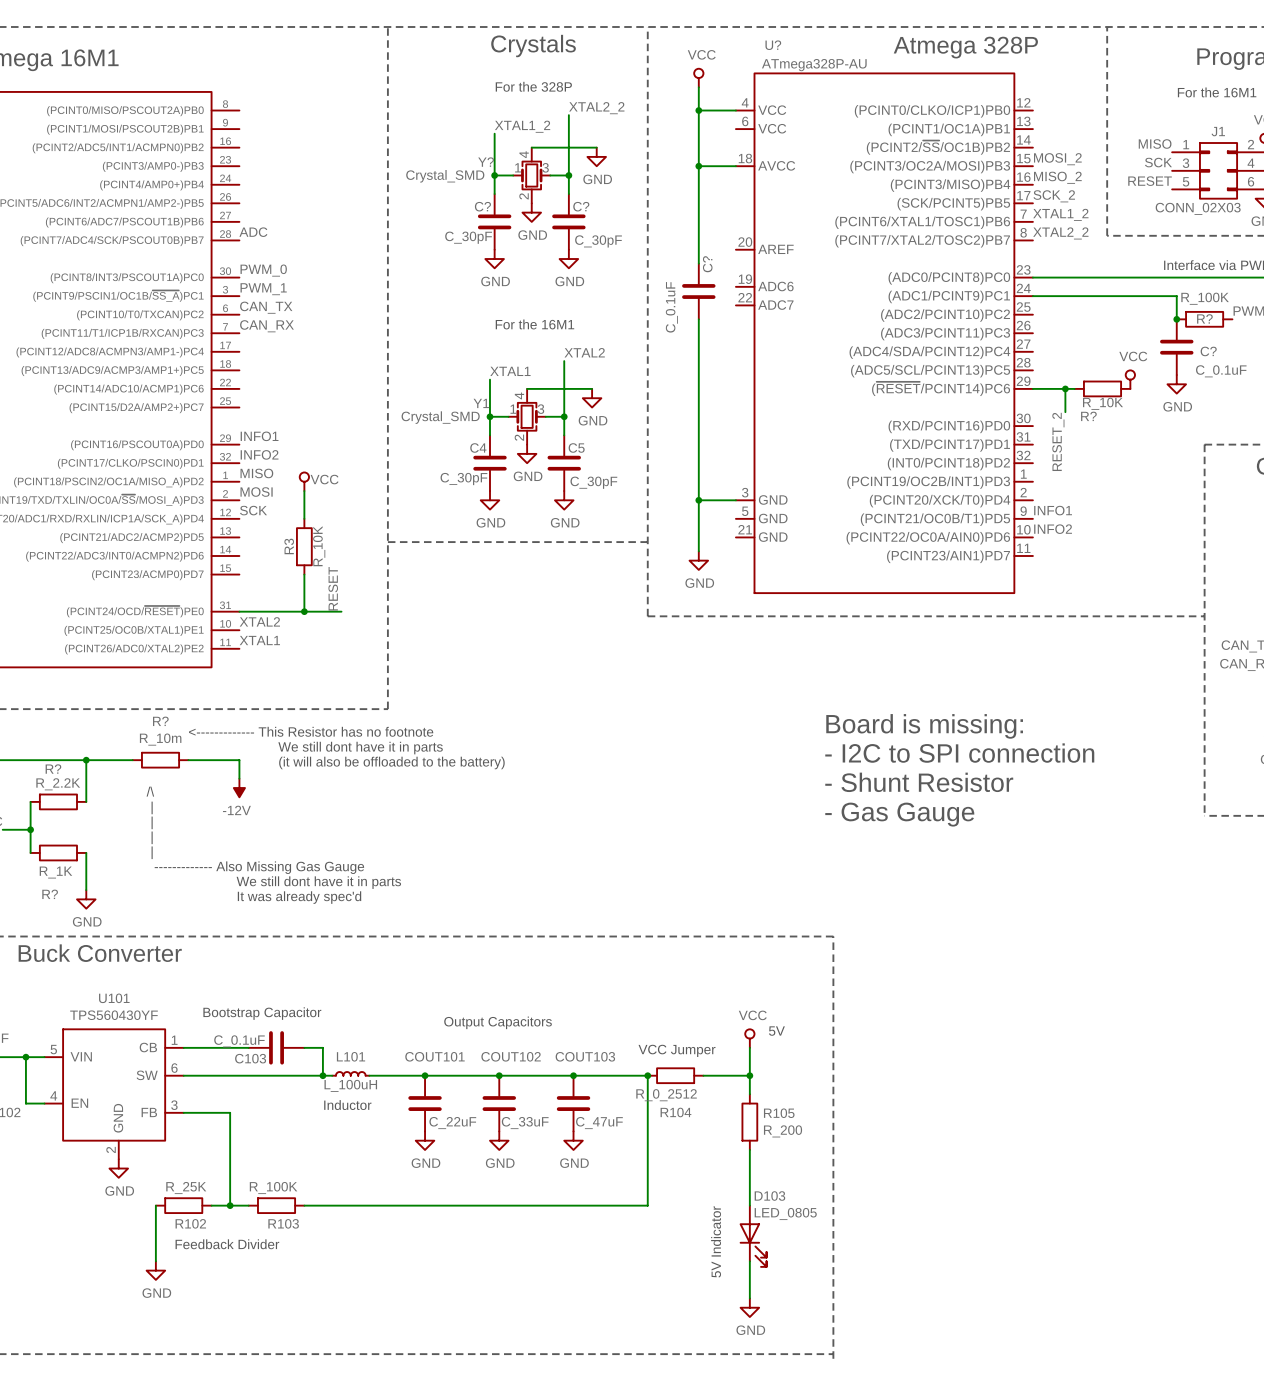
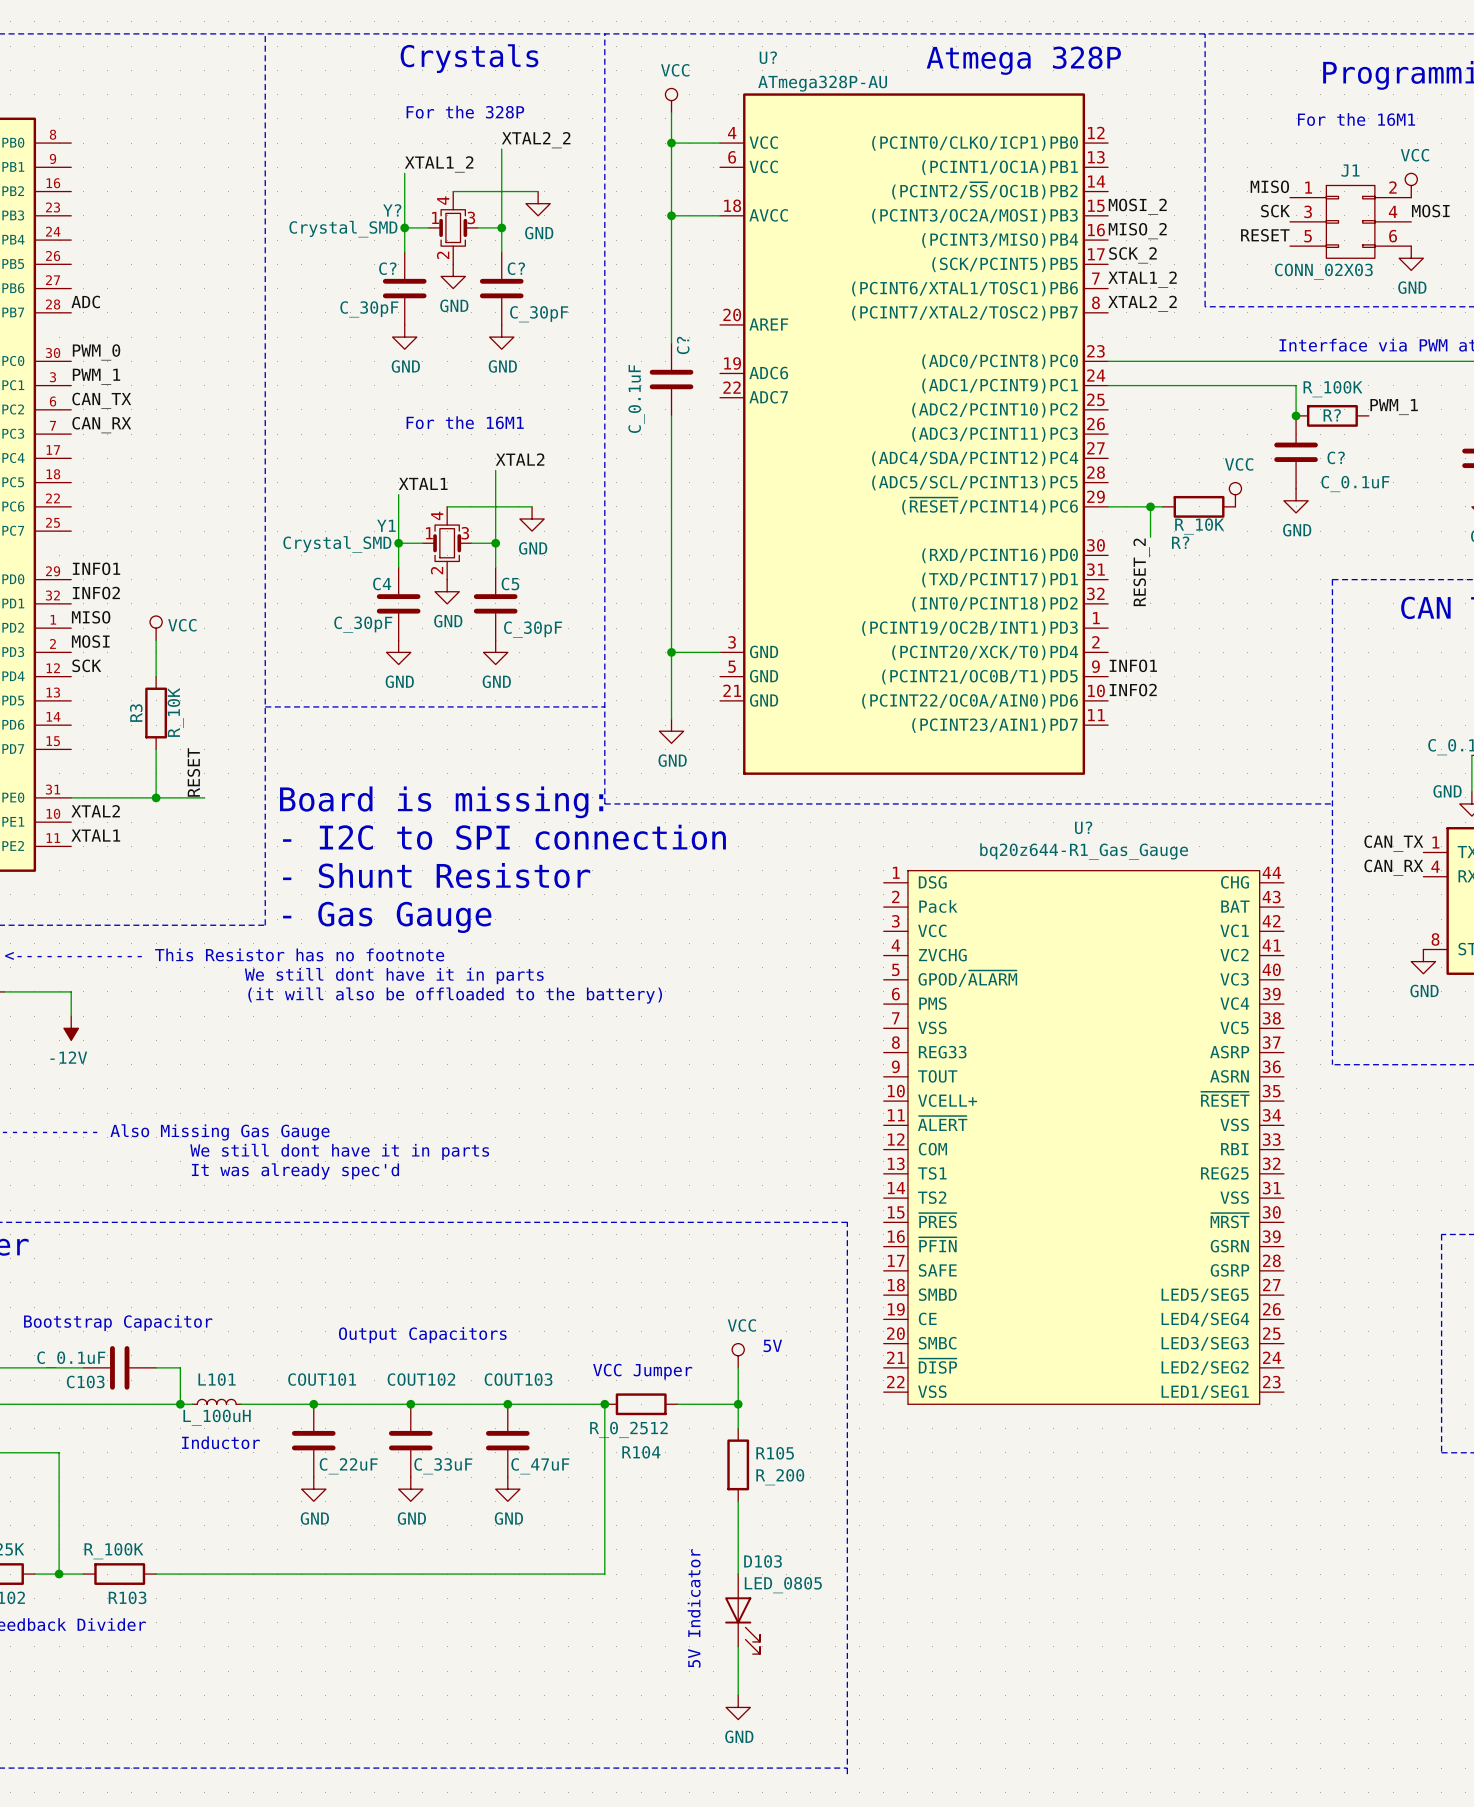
text: none -> Board is missing: (441, 802)
text: none -> - I2C to SPI connection (504, 837)
text: none -> - Shunt Resistor (436, 875)
text: none -> - Gas Gauge (387, 917)
text: Board is missing: (924, 726) -> none
text: - I2C to SPI connection (959, 753) -> none
text: - Shunt Resistor (919, 782) -> none
text: - Gas Gauge (899, 814) -> none
U?: none -> bq20z644-R1_Gas_Gauge (1083, 1137)

